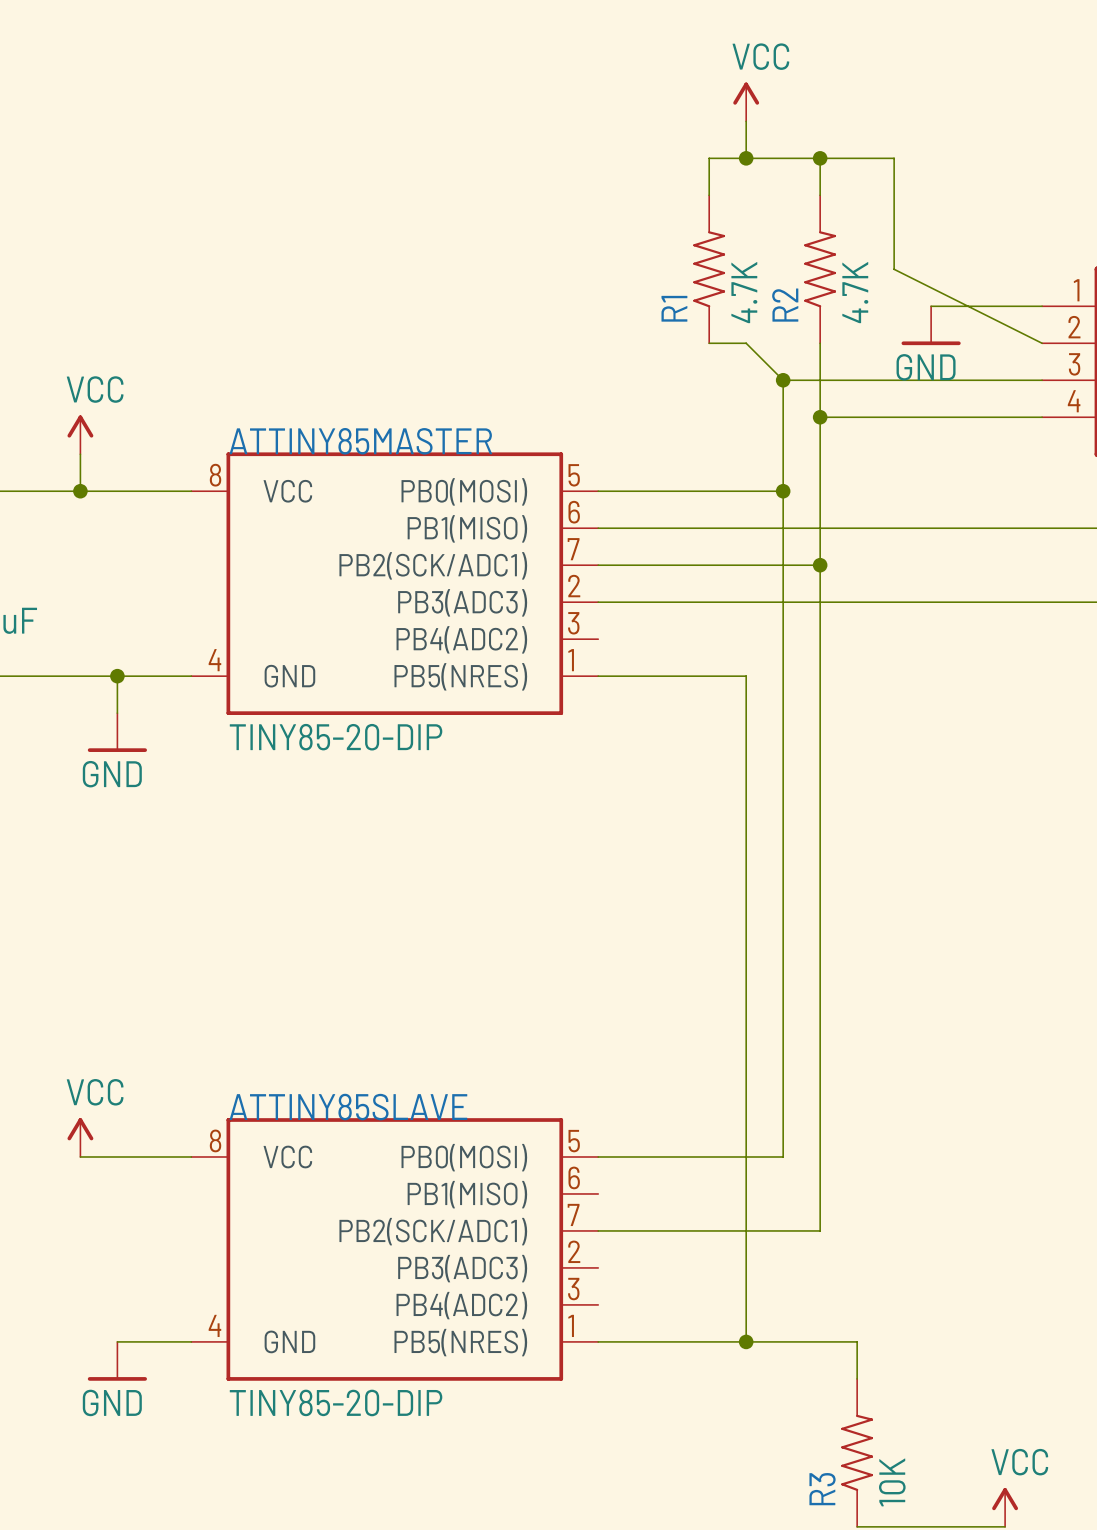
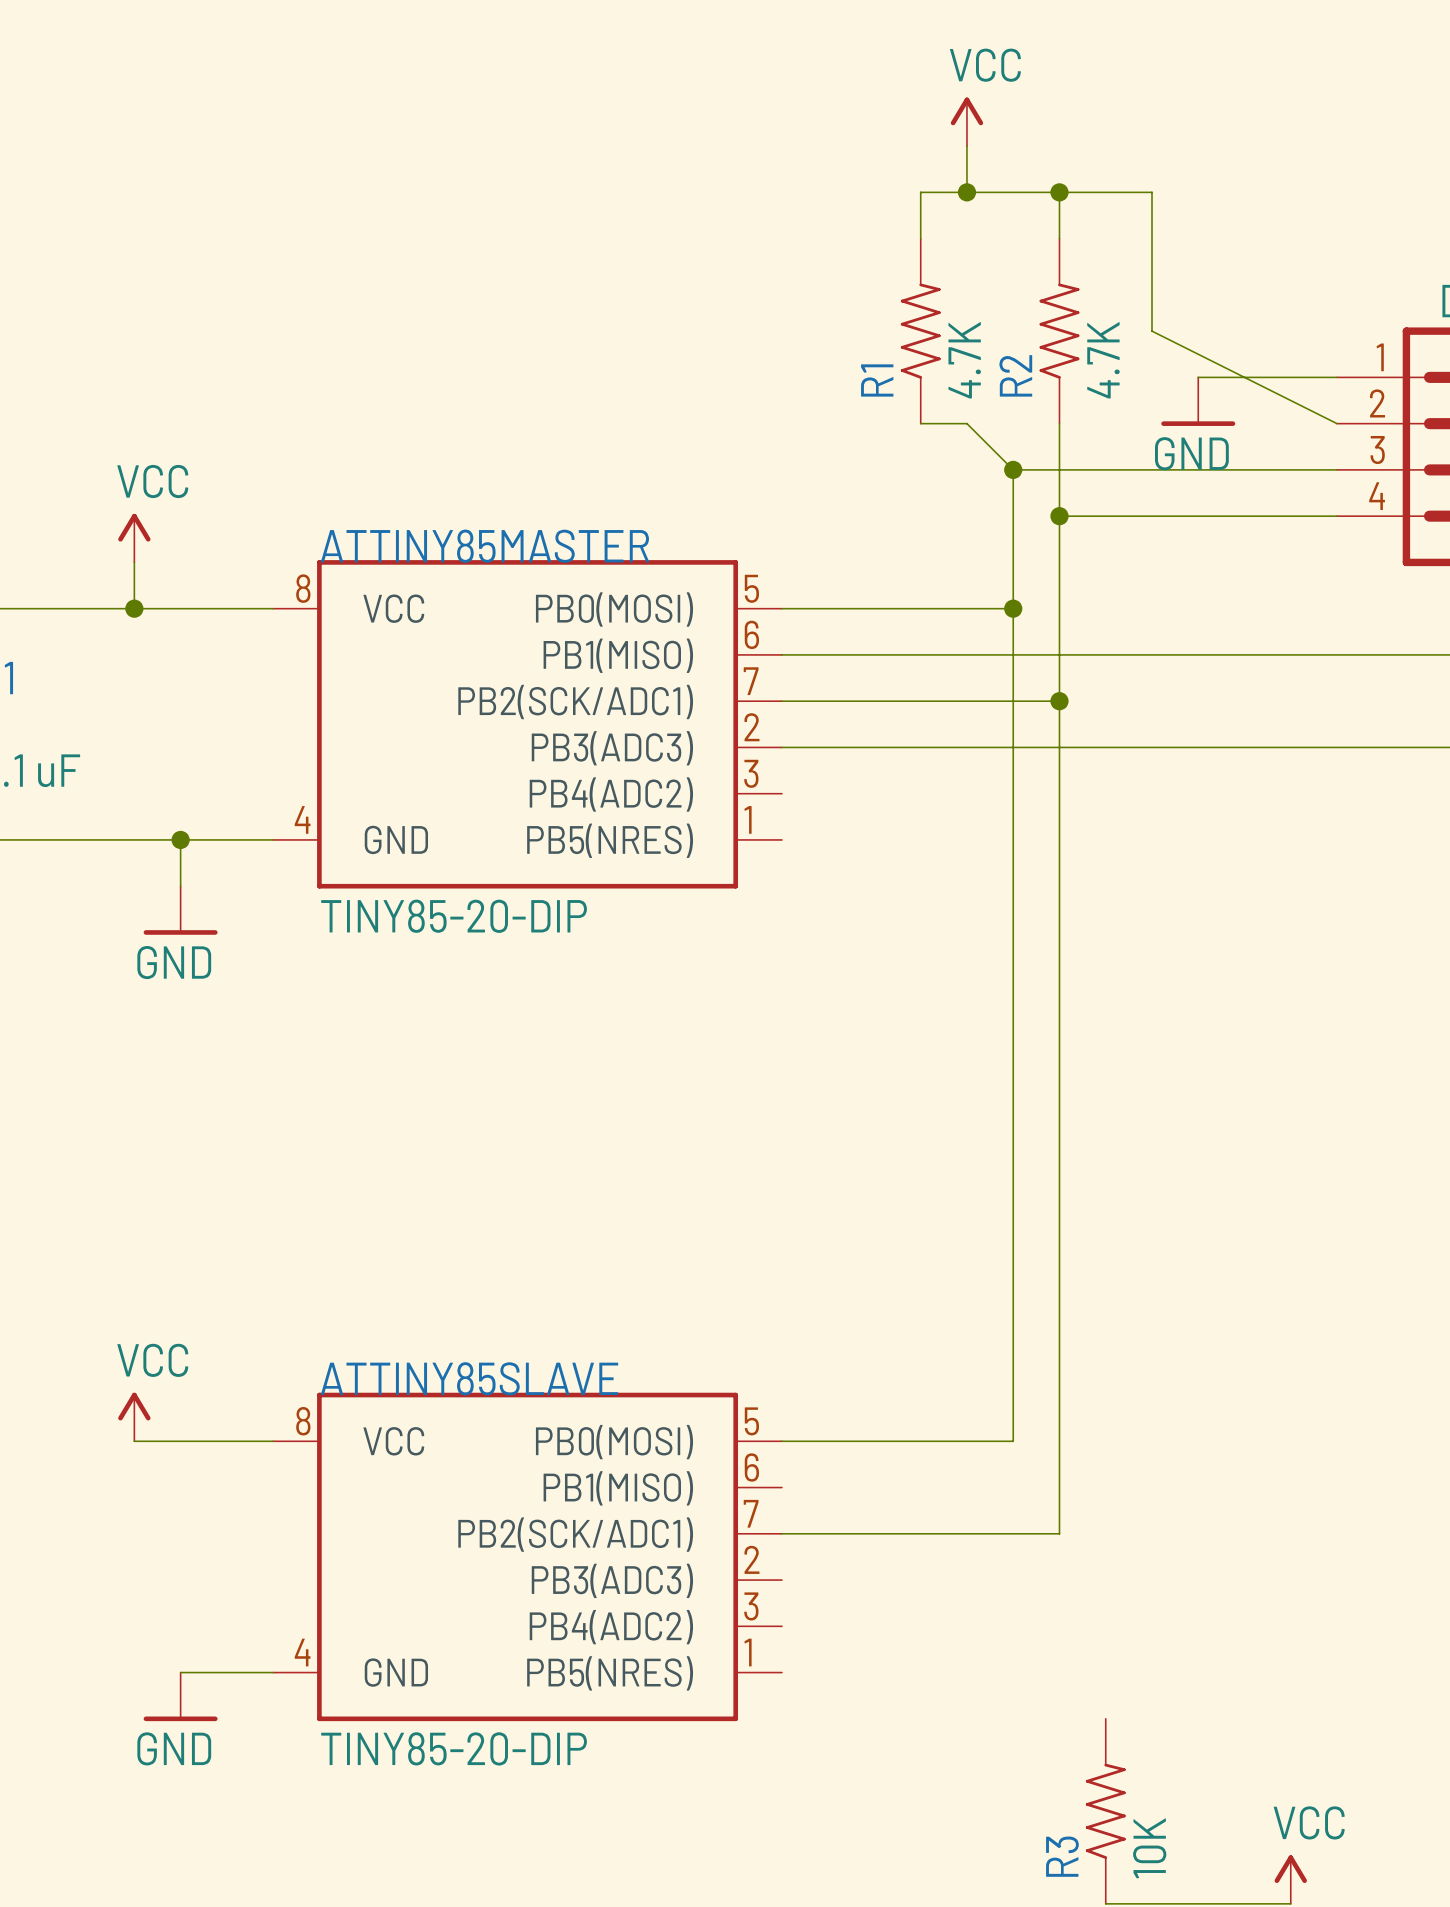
wire: (598, 676) (746, 676) (746, 1341) -> none
wire: (598, 1341) (857, 1341) (857, 1378) -> none
junction: (746, 1341) -> none

